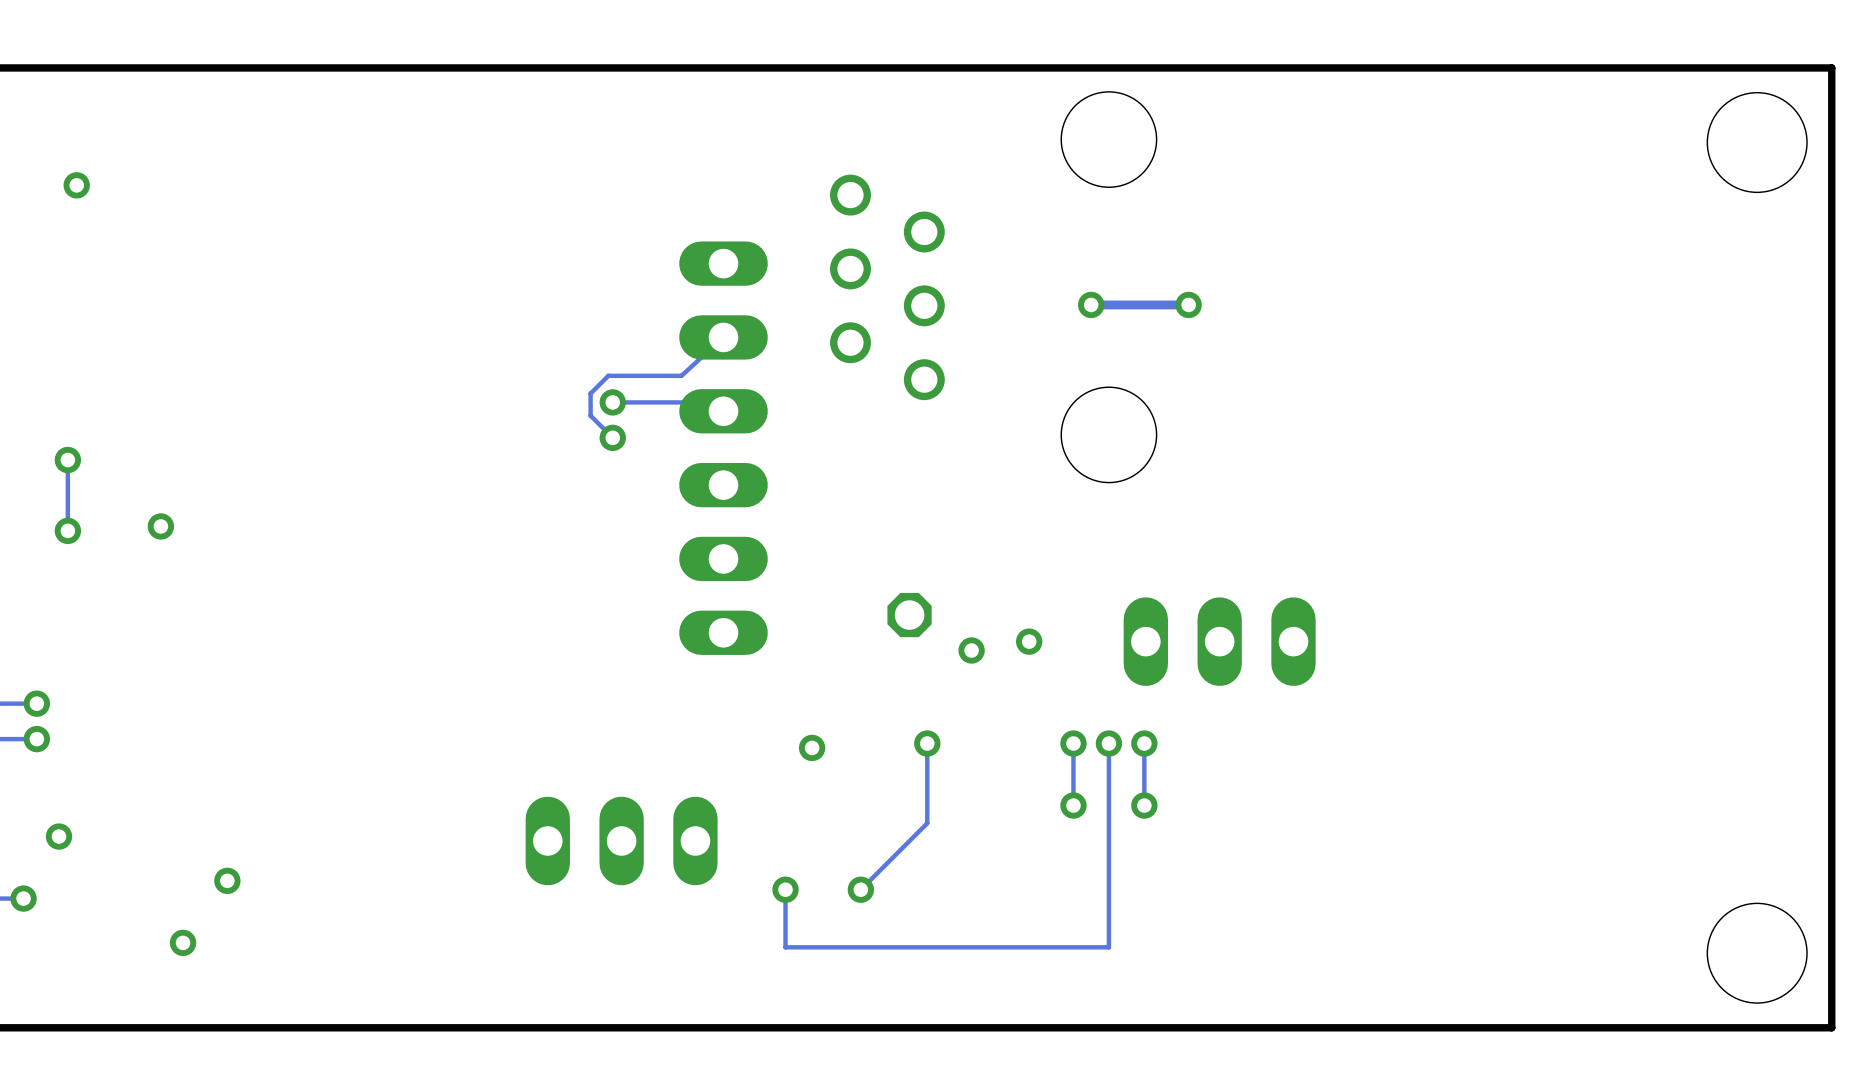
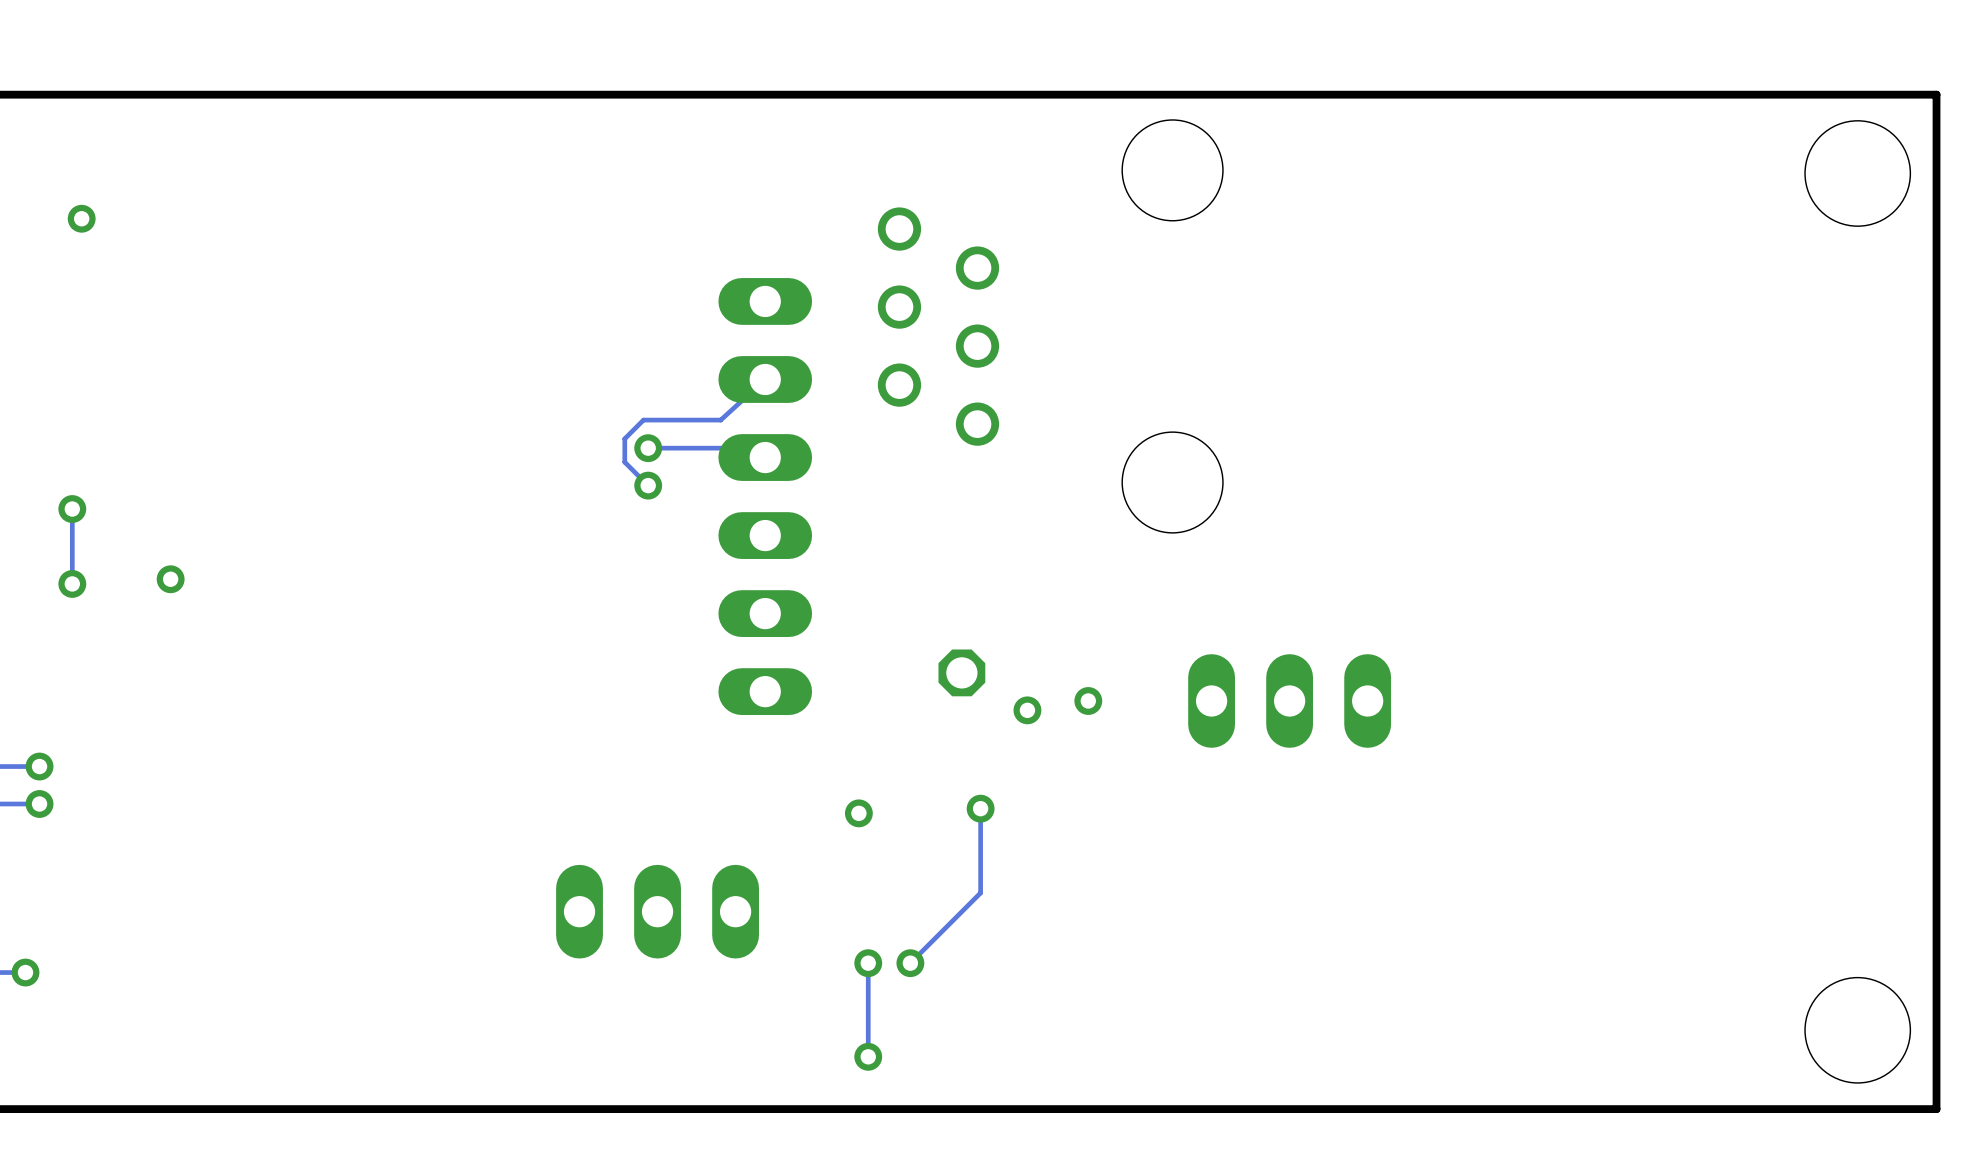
via: (1091, 304) -> none
track: (1188, 304) (1091, 304) -> none
via: (1188, 304) -> none
track: (1073, 743) (1073, 805) -> none
via: (1073, 743) -> none
track: (1108, 743) (1108, 947) (785, 947) (785, 889) -> none
via: (1108, 743) -> none
track: (1144, 743) (1144, 805) -> none
via: (1144, 743) -> none
via: (1073, 805) -> none
via: (1144, 805) -> none
via: (59, 836) -> none
via: (227, 880) -> none
via position: (785, 889) -> (868, 963)
track: none -> (868, 963) (868, 1056)
via: (183, 942) -> none
via: none -> (868, 1056)

